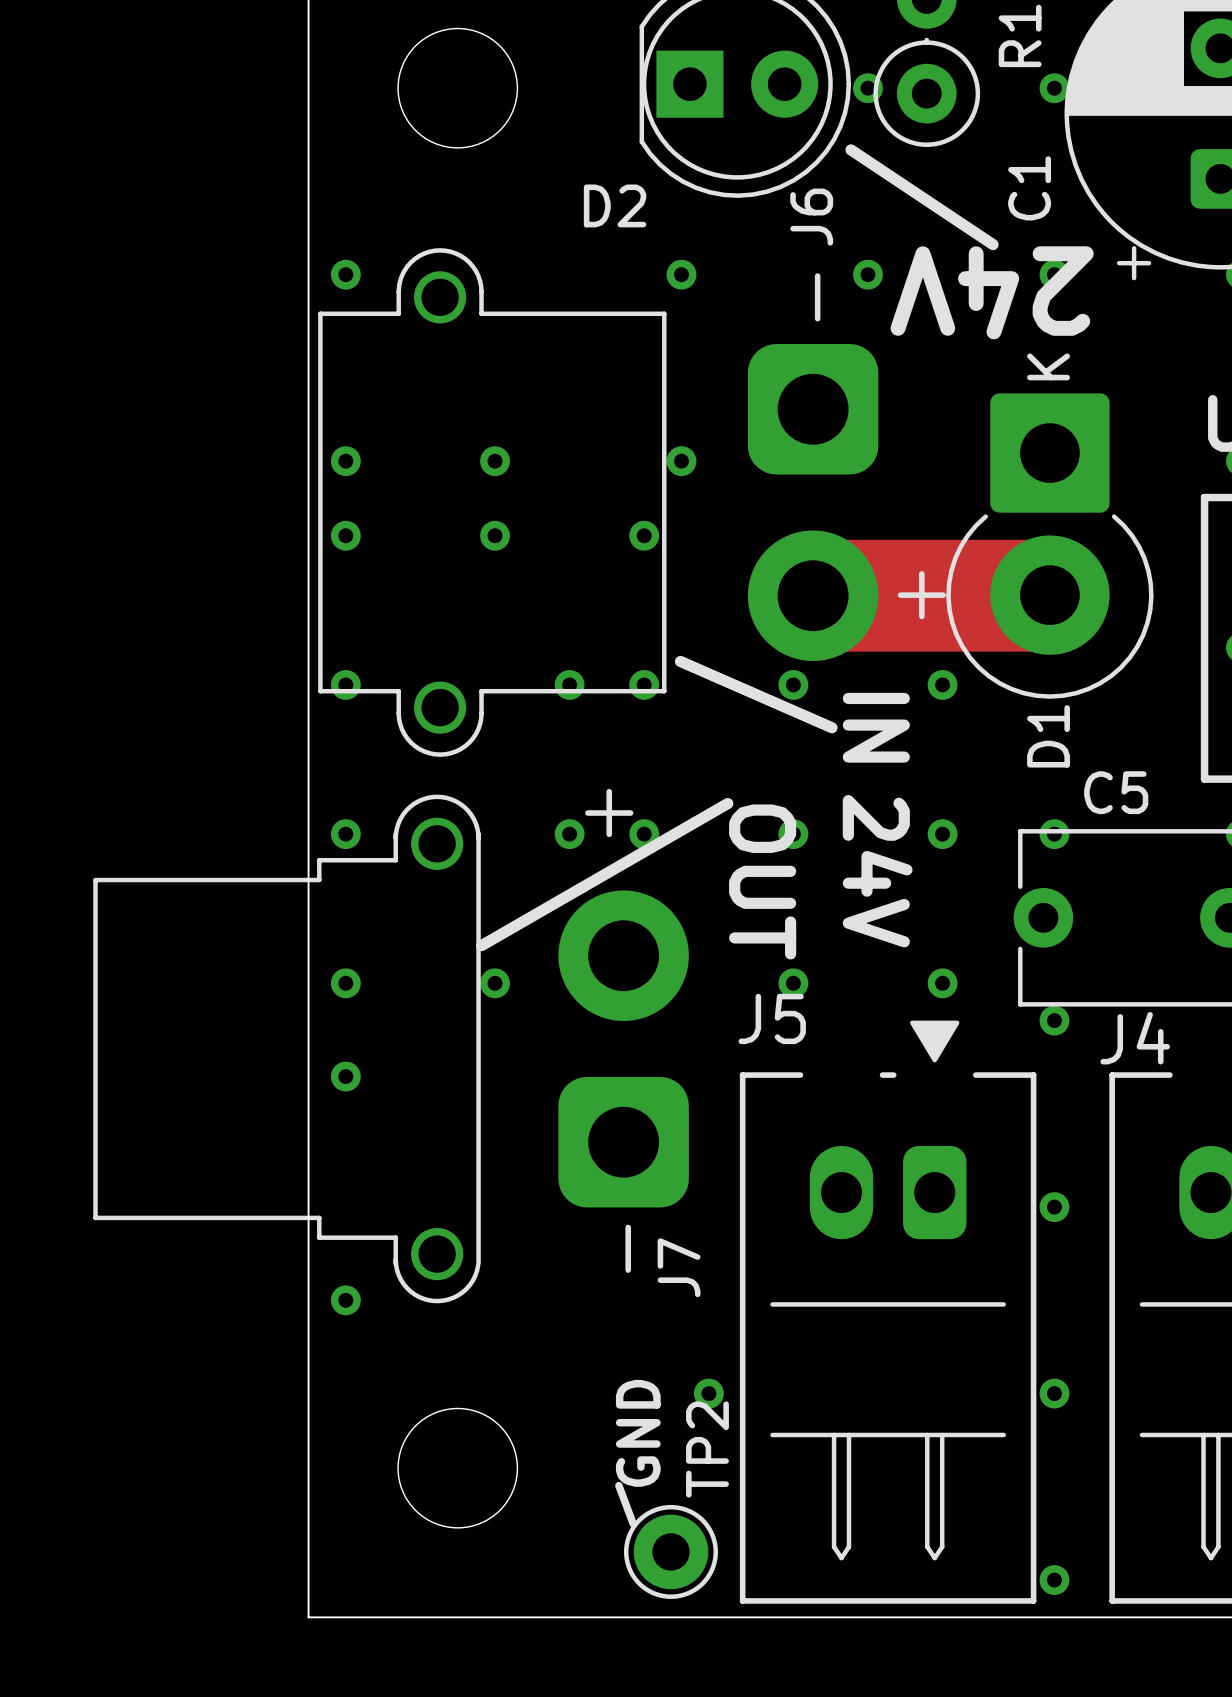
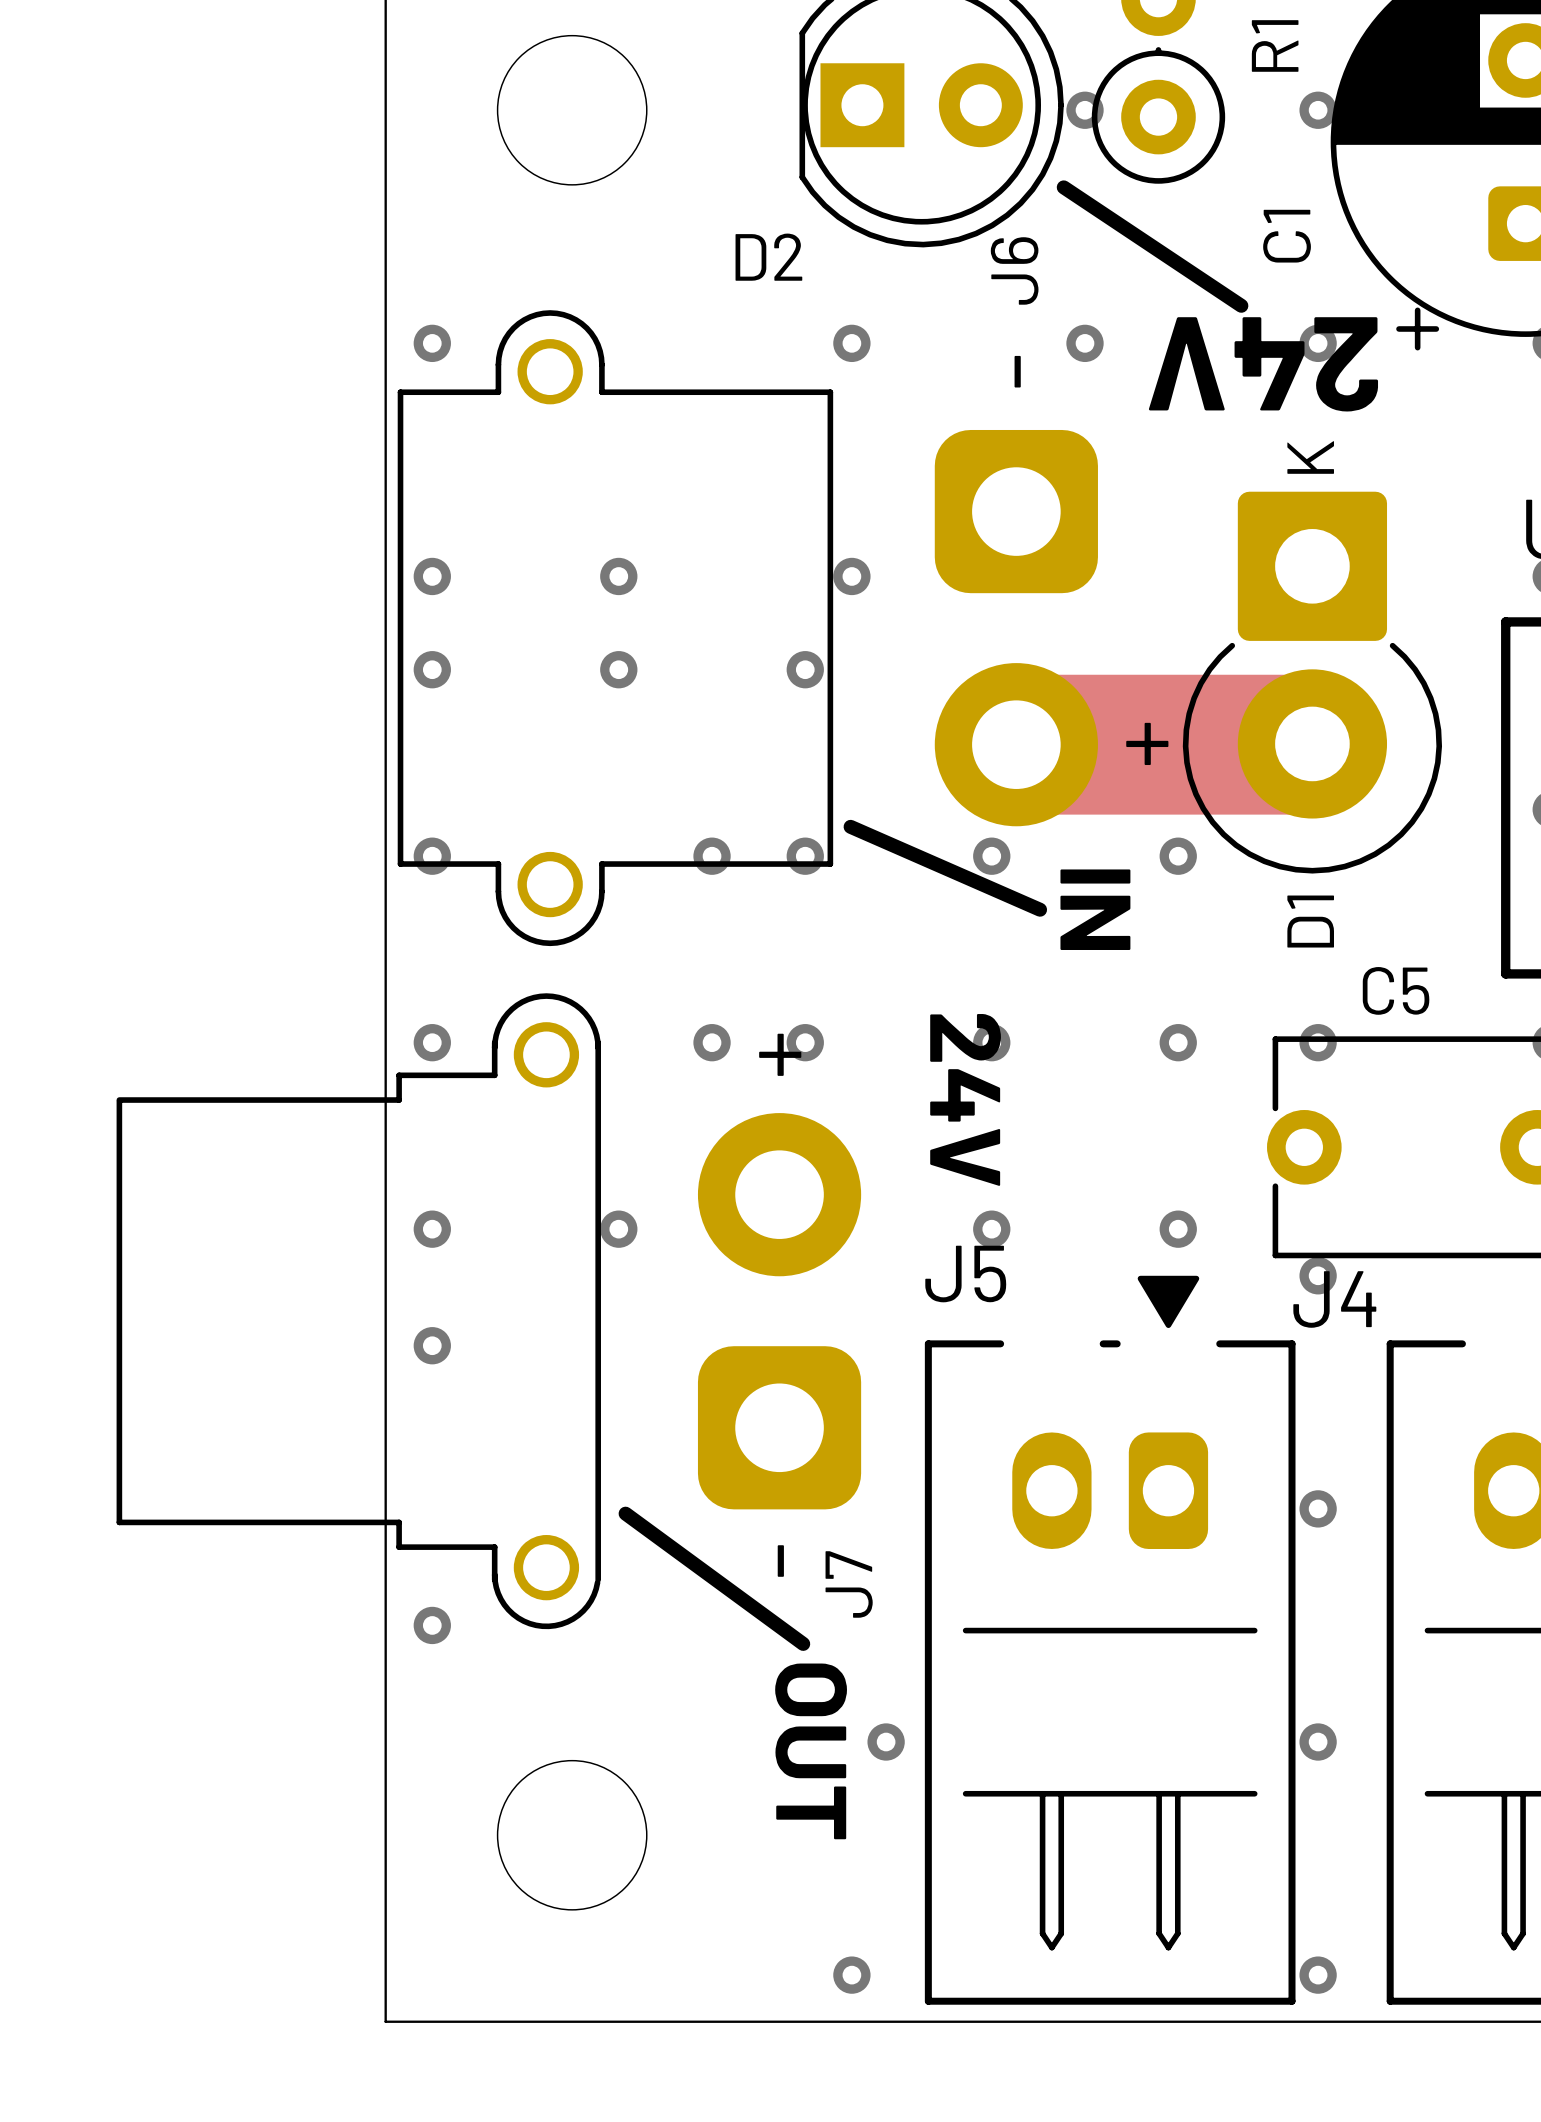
line: (727, 803) (481, 945) -> none
J7 text position: + (609, 813) -> + (780, 1054)
text: 24V (877, 871) -> none
text: OUT (762, 882) -> 24V (965, 1099)
J4 name position: J4 (1135, 1038) -> J4 (1334, 1299)
line: none -> (625, 1513) (803, 1643)
text: none -> OUT (811, 1751)
text: GND (638, 1433) -> none
line: (618, 1485) (633, 1523) -> none
TP2: (670, 1551) -> none
via: none -> (851, 1975)

